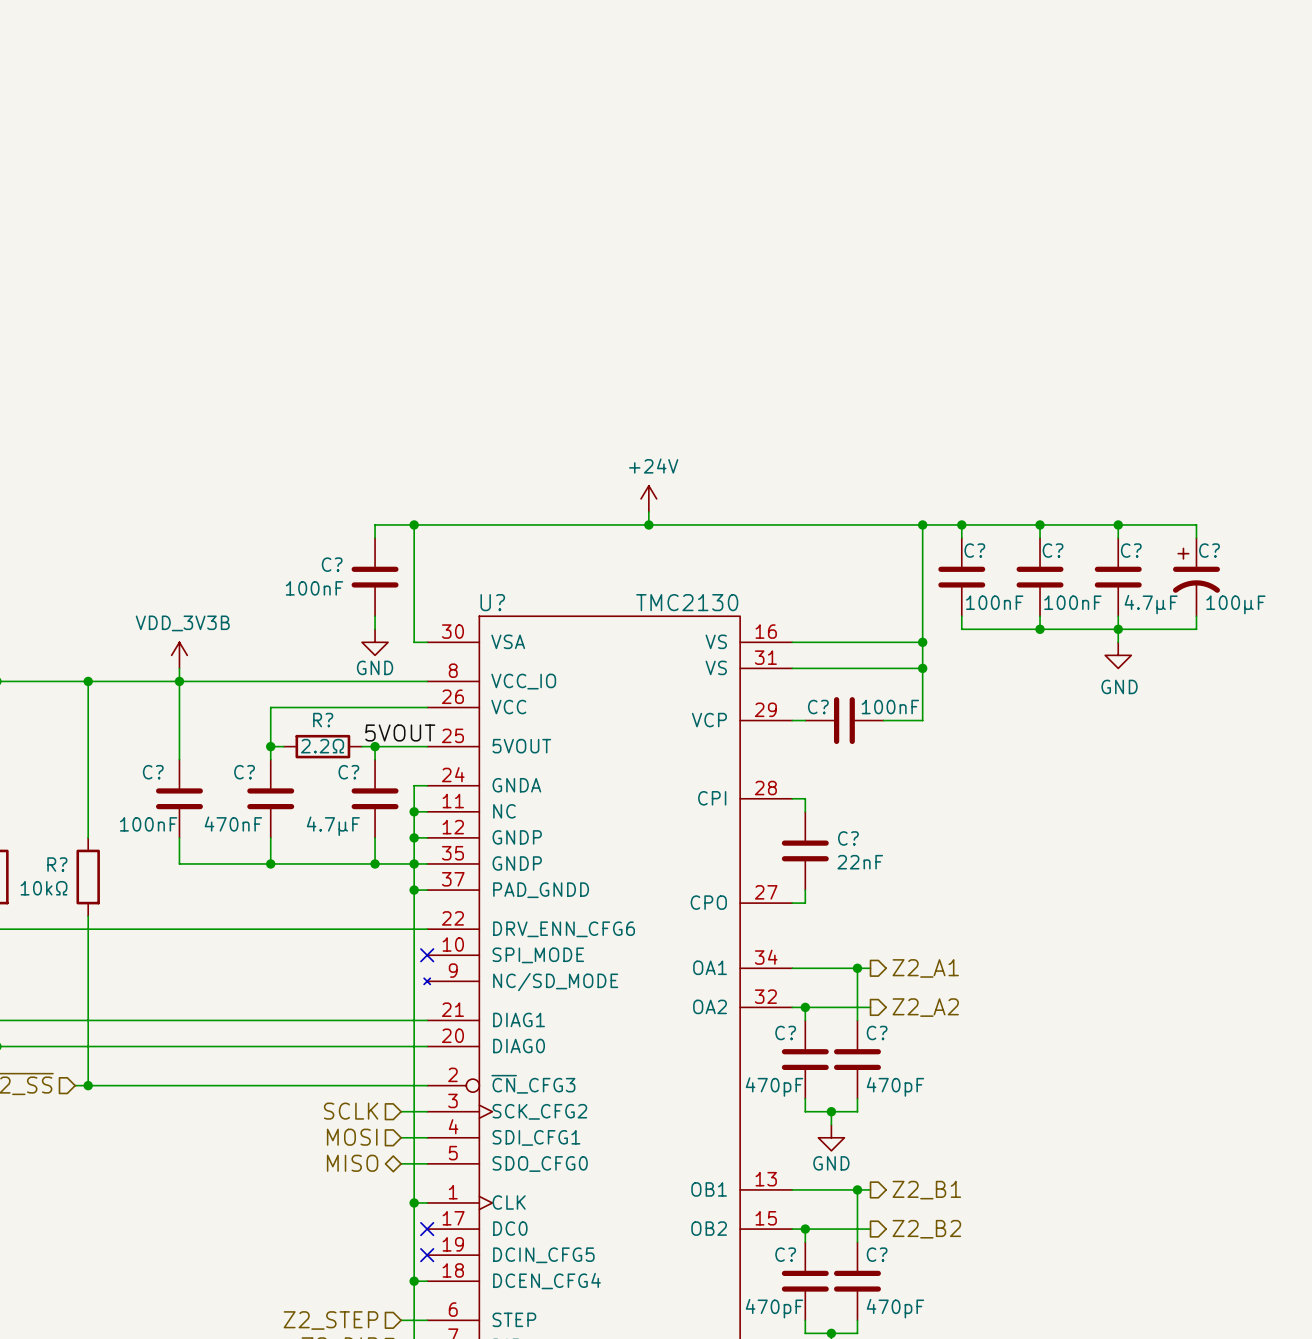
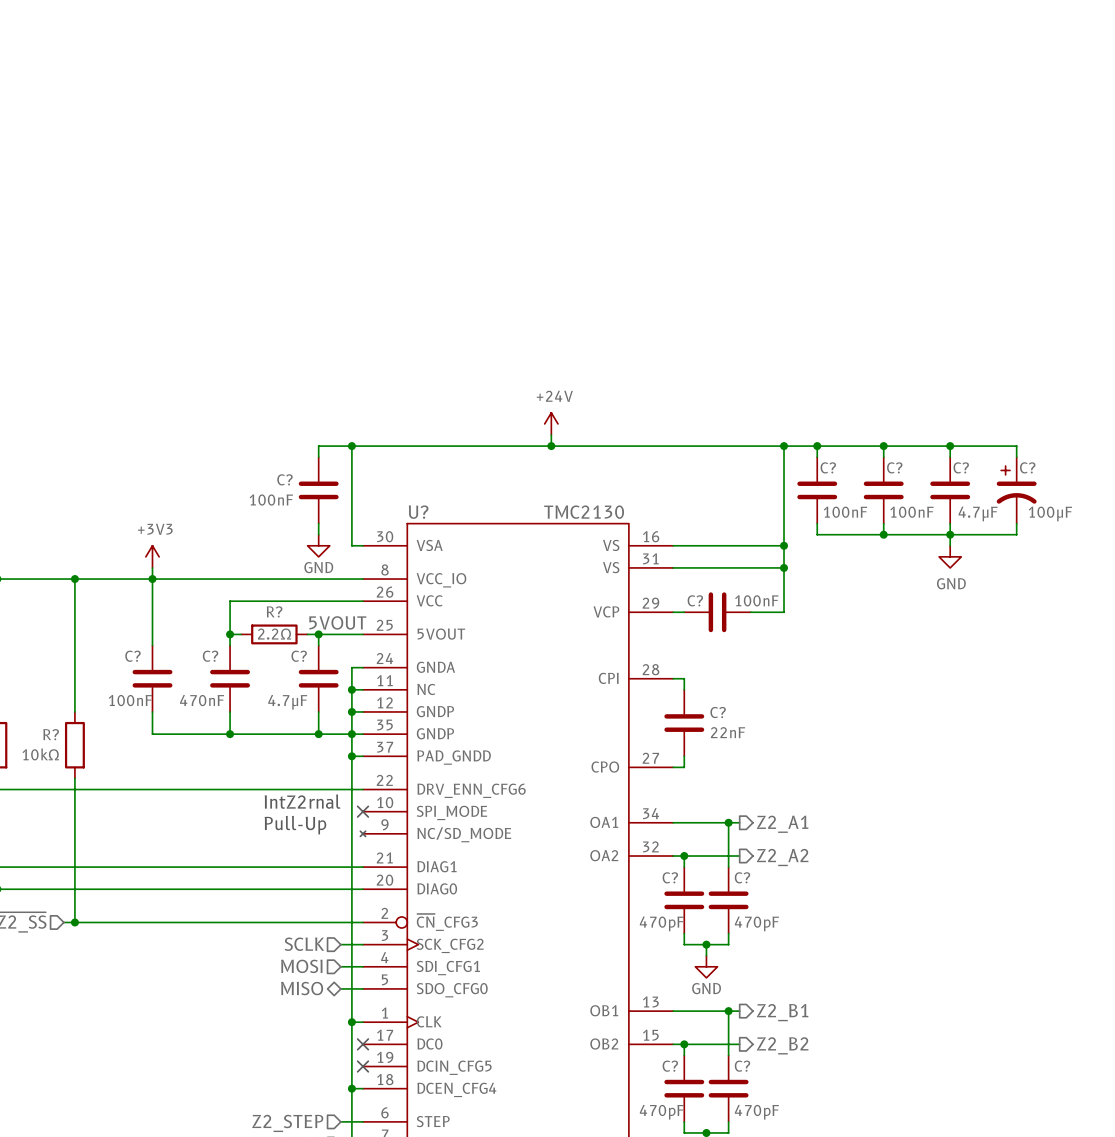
power symbol: VDD_3V3B (179, 655) -> +3V3 (152, 556)
text: none -> IntZ2rnal (302, 801)
text: none -> Pull-Up (295, 825)

